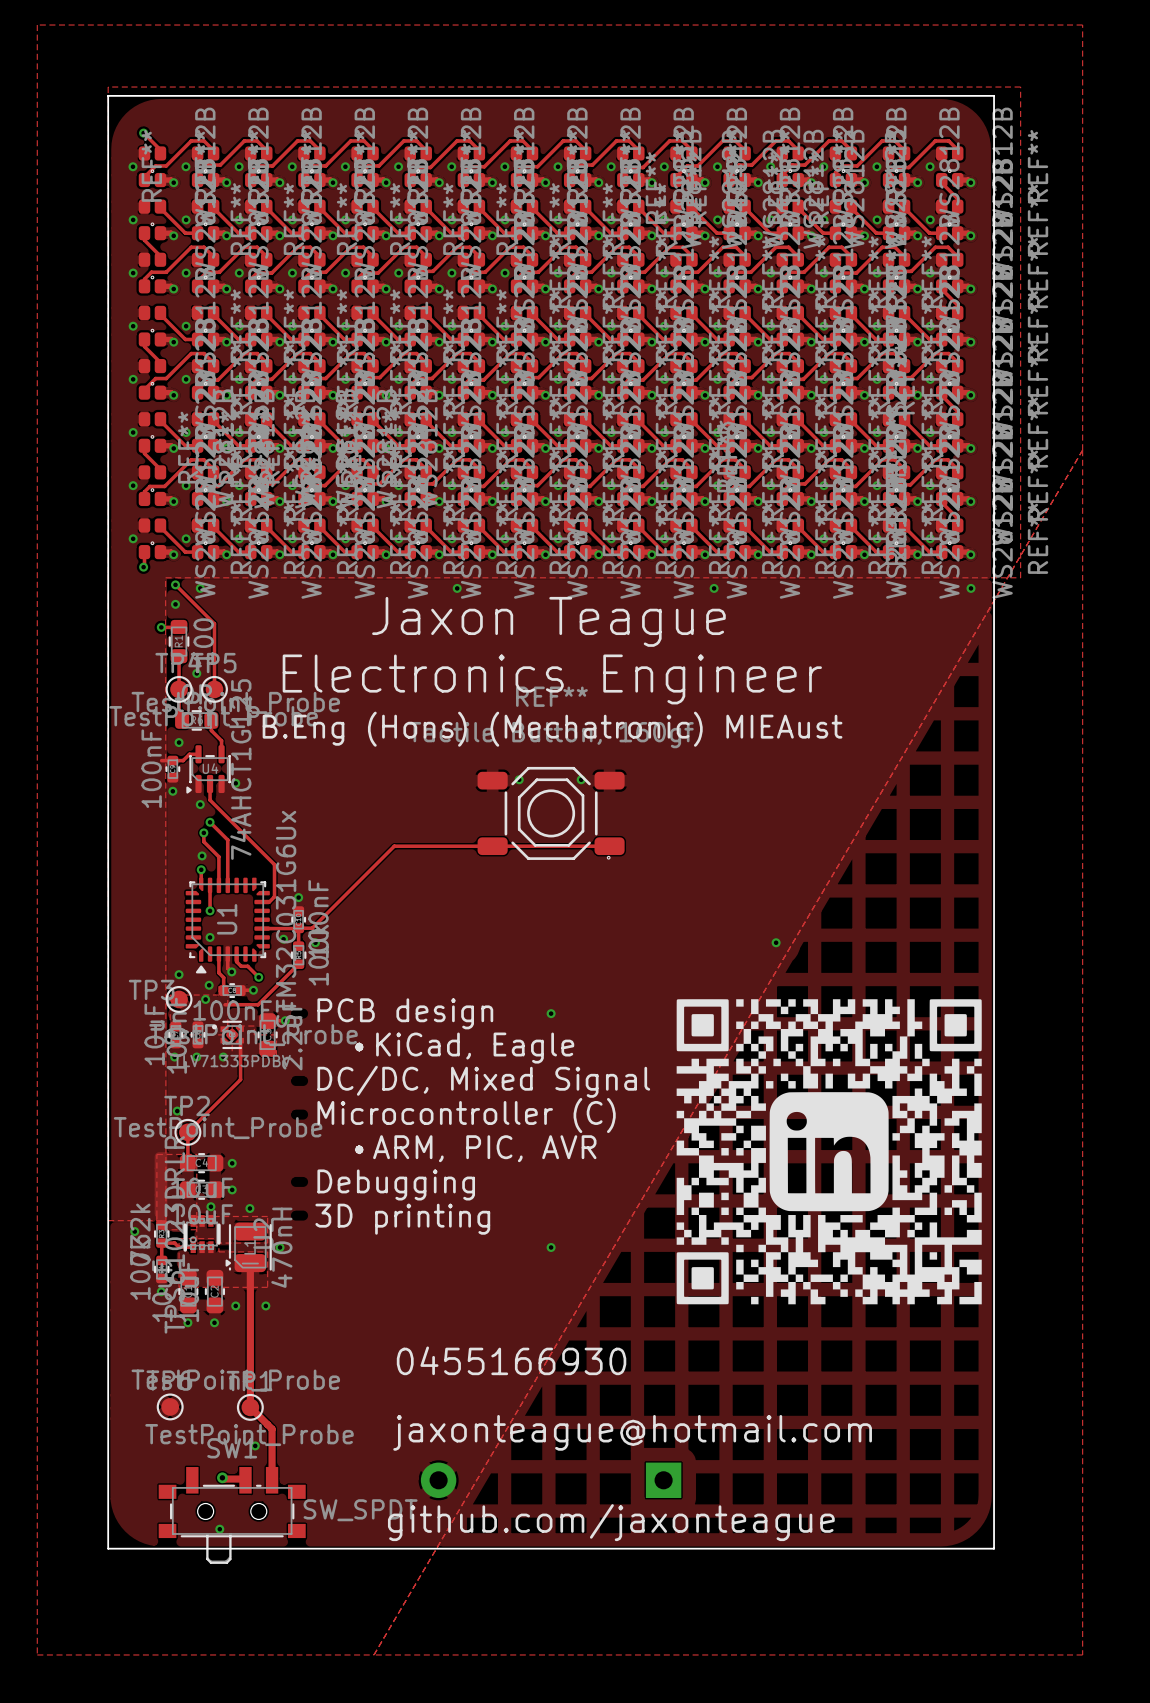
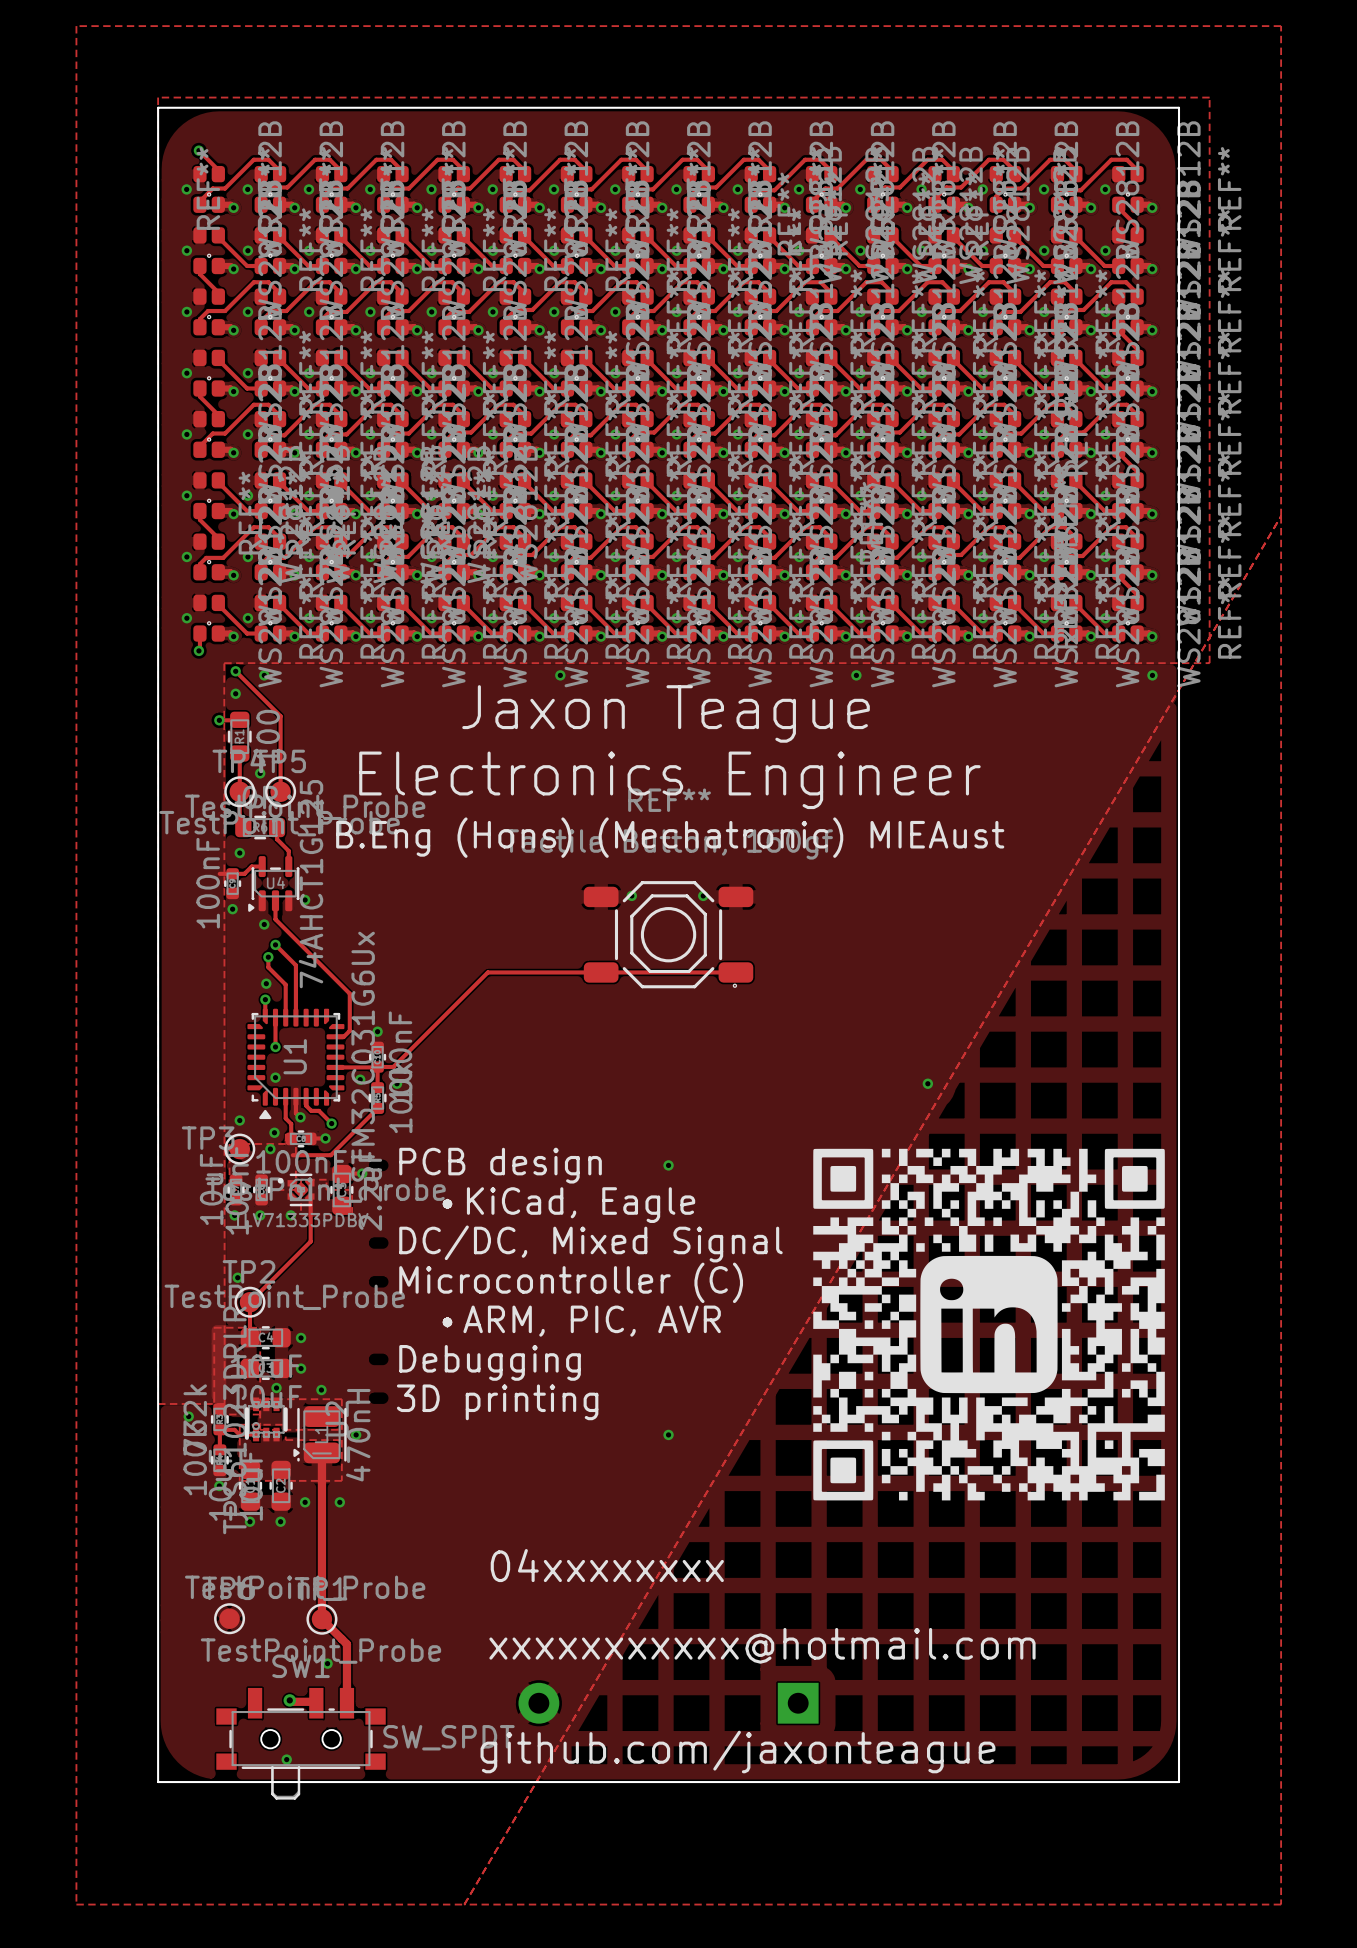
text: 0455166930 (511, 1360) -> 04xxxxxxxx (607, 1565)
text: jaxonteague@hotmail.com (632, 1432) -> xxxxxxxxxxx@hotmail.com (762, 1645)

